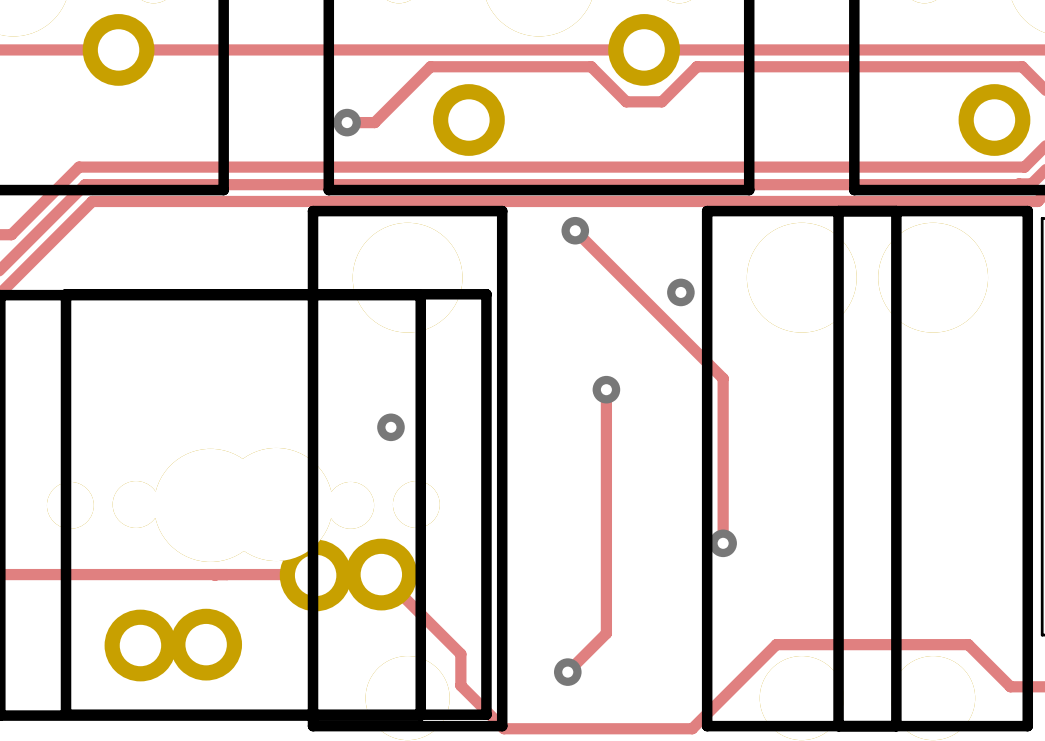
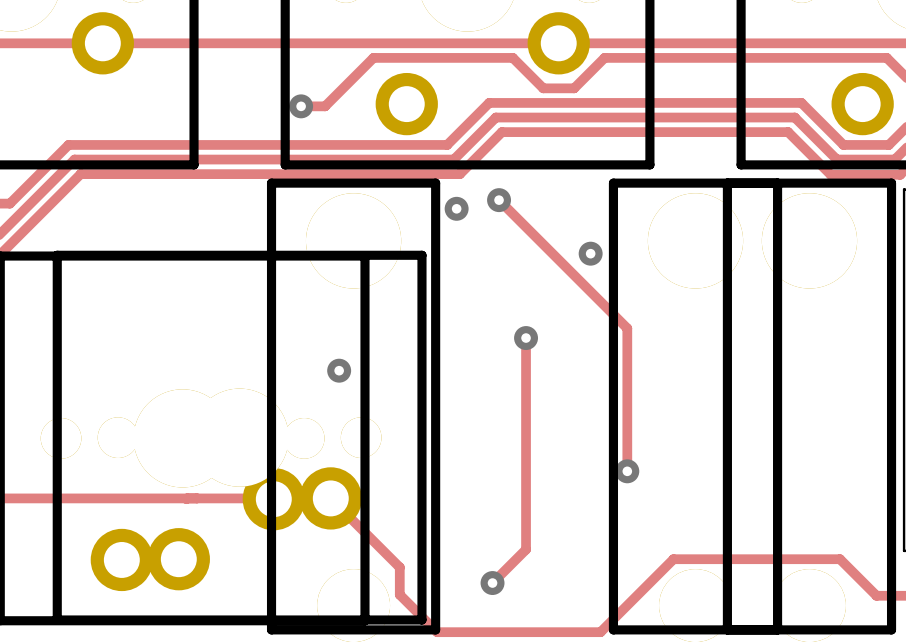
track: (515, 167) (972, 167) -> (447, 144) (489, 102) (801, 102) (843, 144)
track: (1018, 183) (85, 184) -> (883, 159) (836, 159) (794, 117) (495, 117) (453, 159) (73, 160)
track: (92, 201) (957, 201) -> (80, 174) (459, 174) (501, 132) (788, 132) (830, 174)
via: none -> (456, 208)

